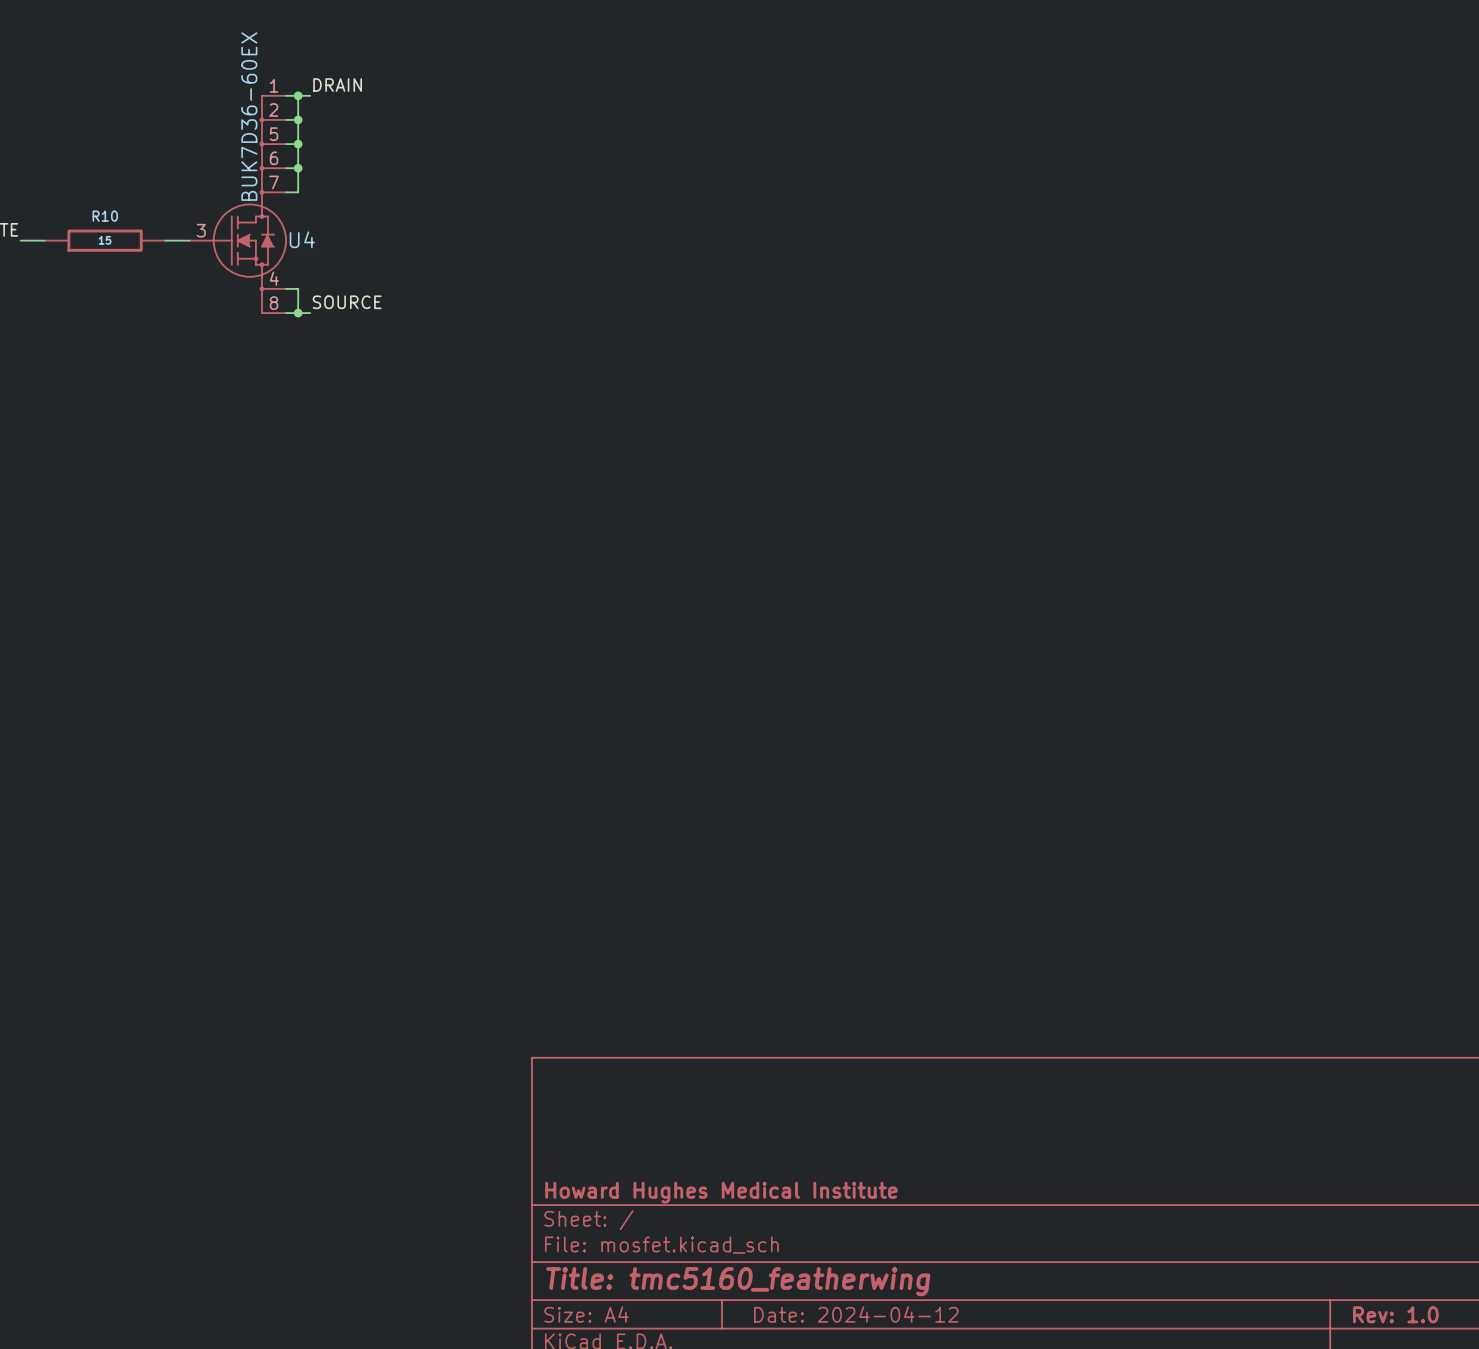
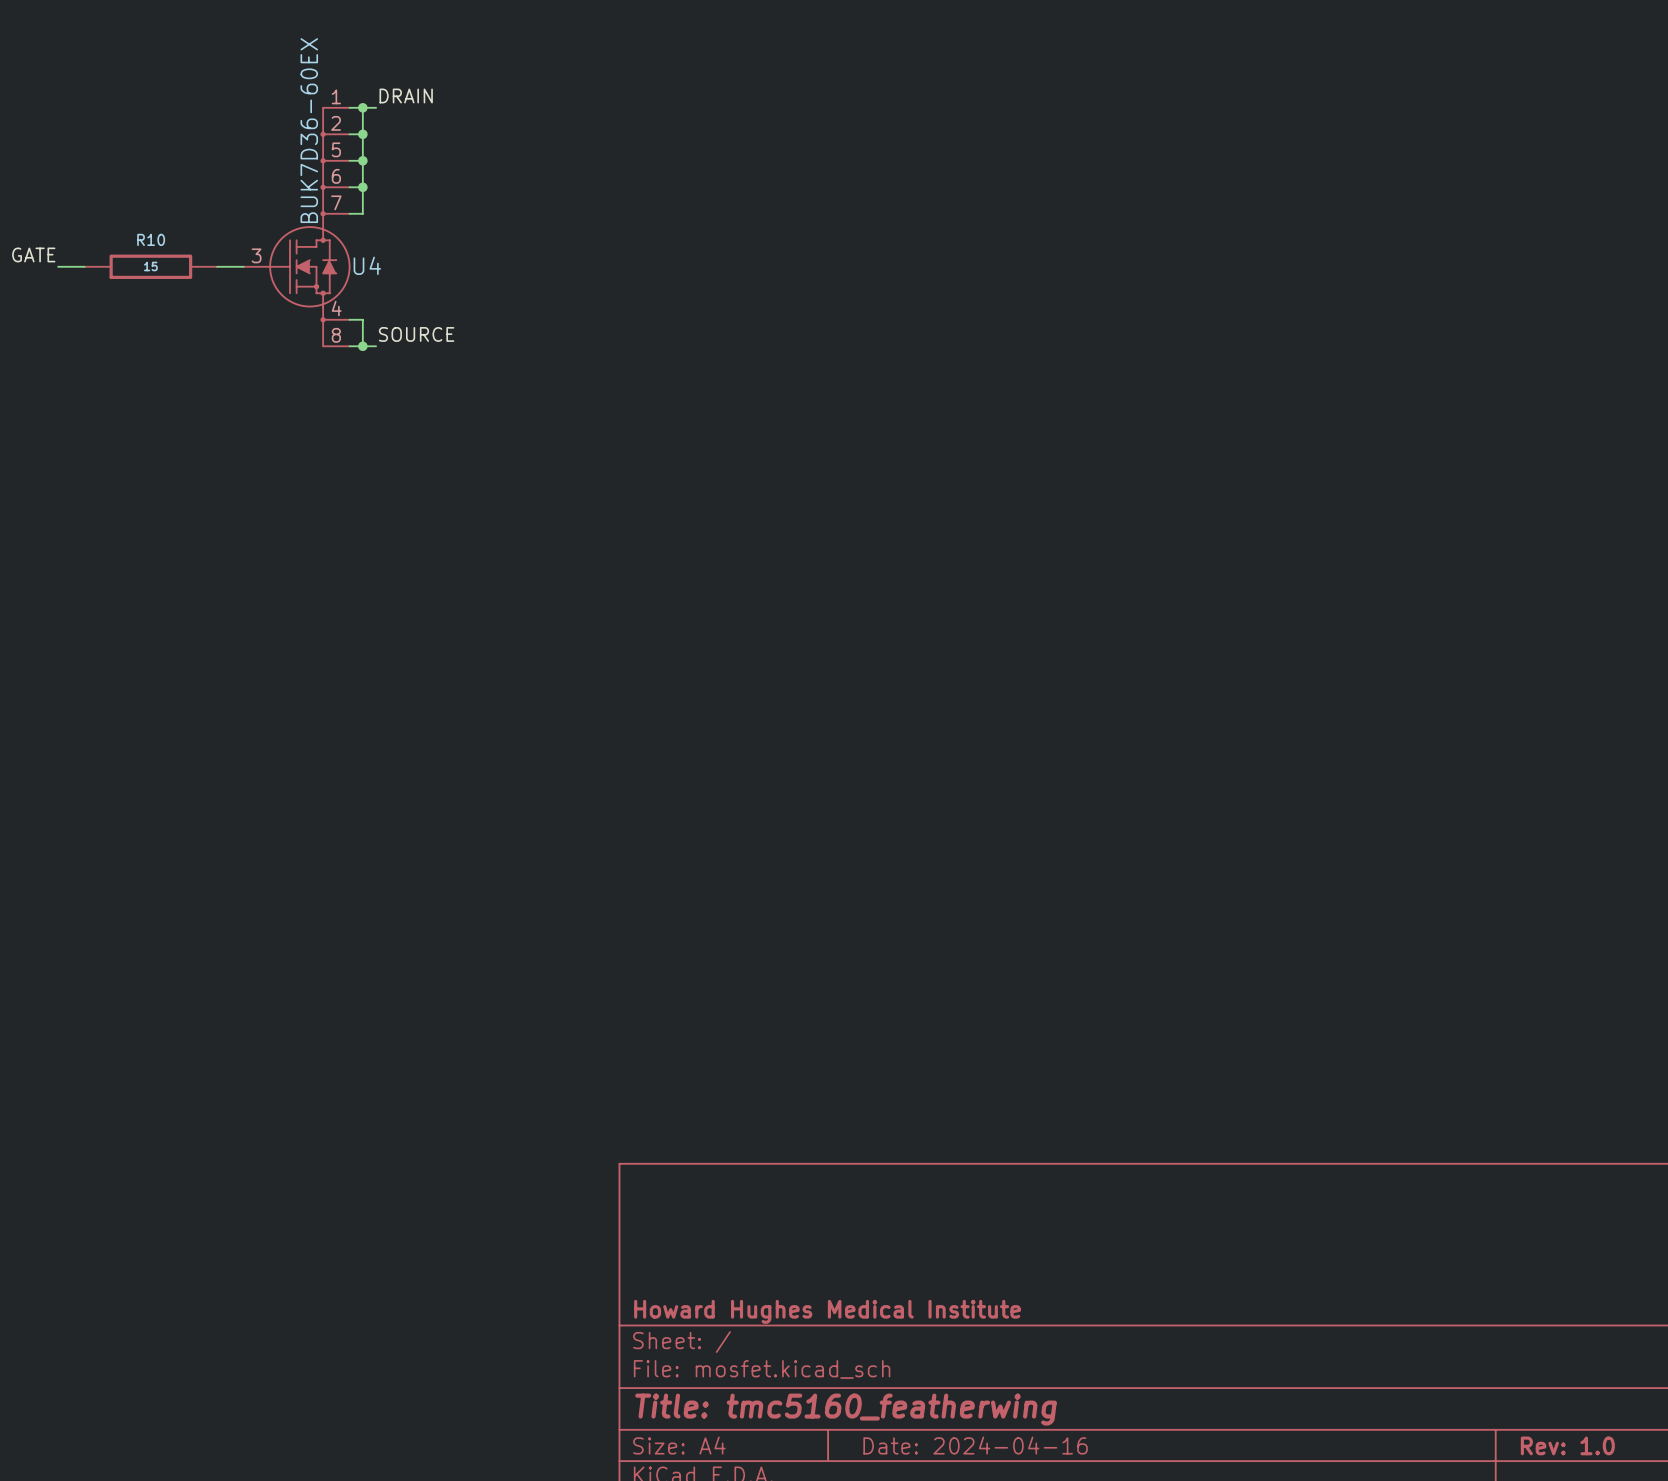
title block: Date: 2024-04-12 (856, 1314) -> Date: 2024-04-16 (975, 1445)

